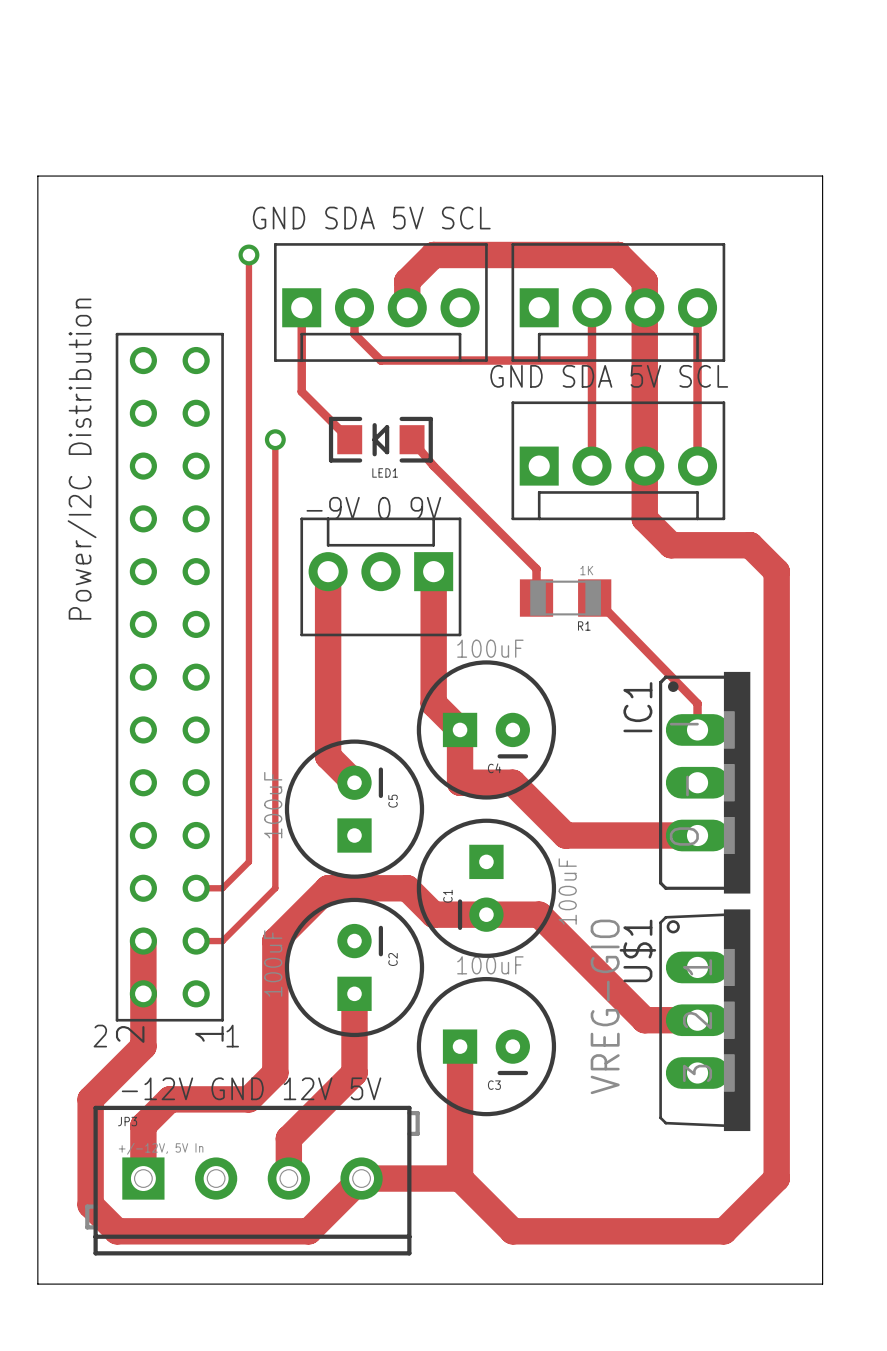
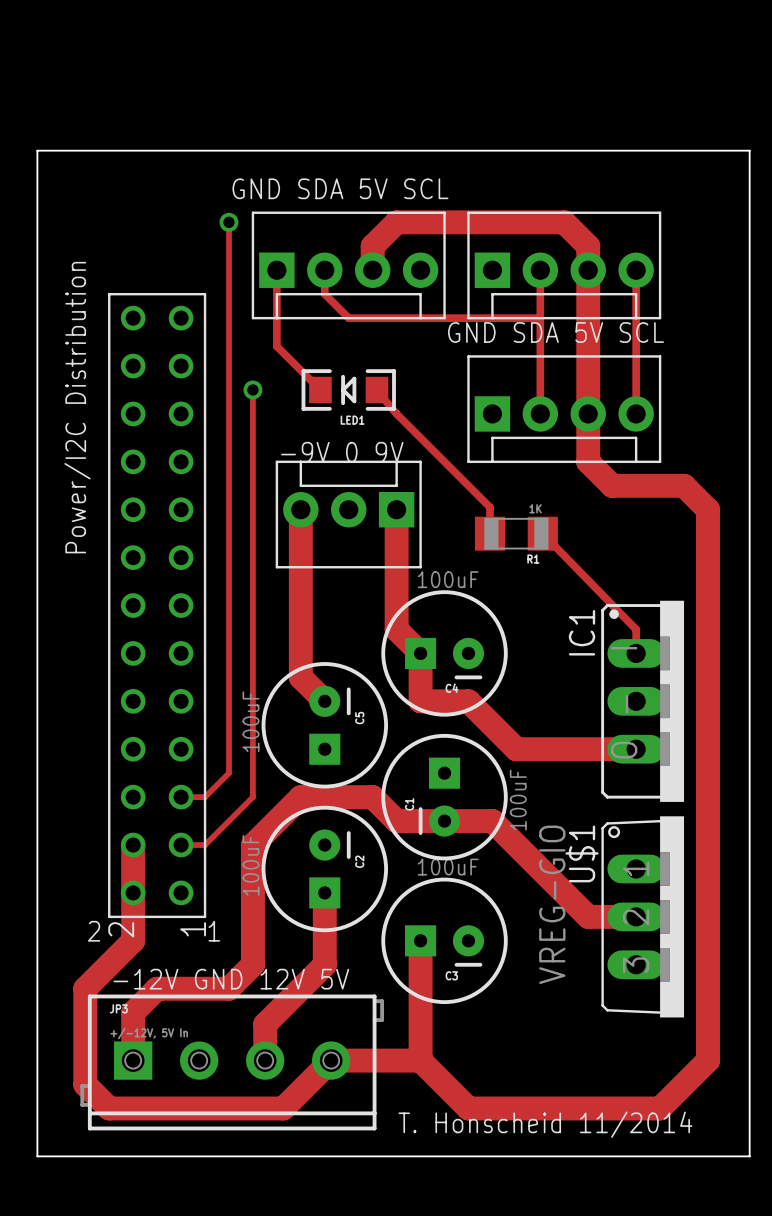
text: none -> T. Honscheid 11/2014 (545, 1124)

